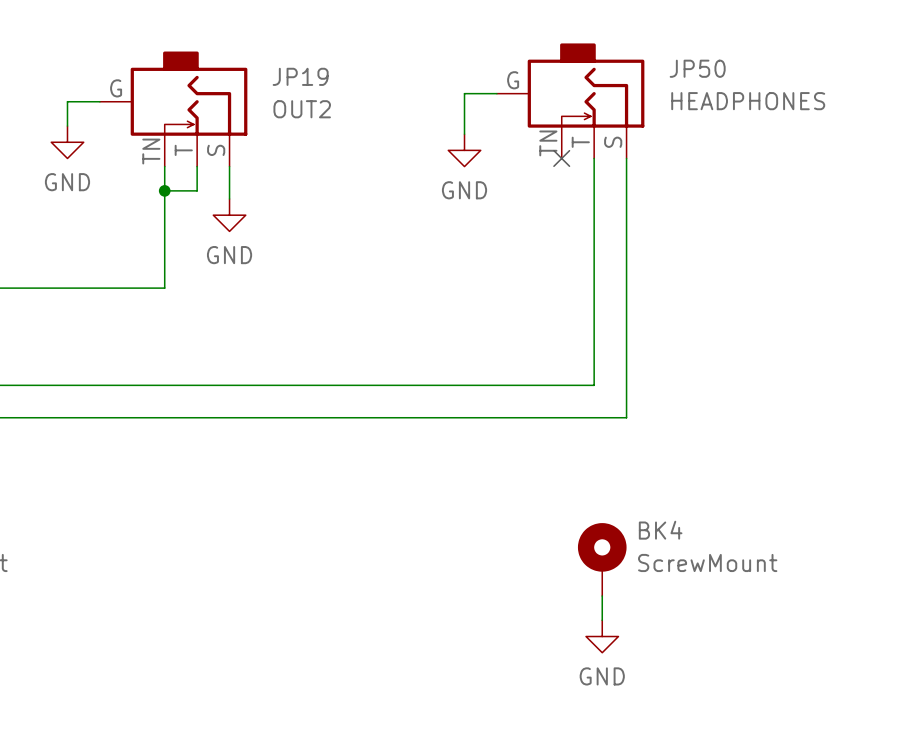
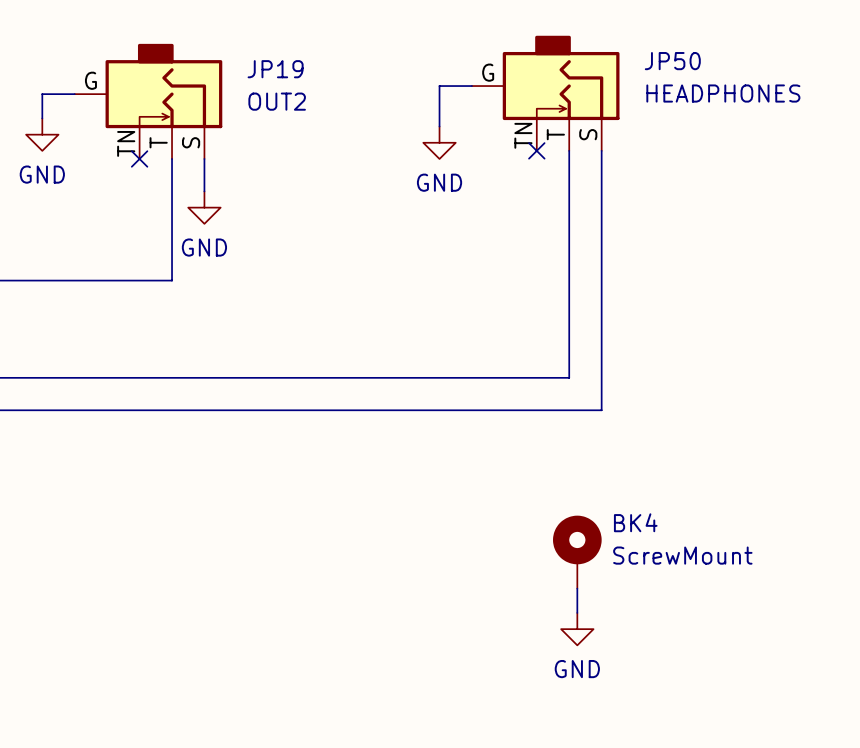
wire: (164, 166) (164, 288) -> (172, 183) (172, 280) (139, 280)
no-connect mark: none -> (139, 158)
wire: (164, 190) (197, 190) -> none
junction: (164, 190) -> none

